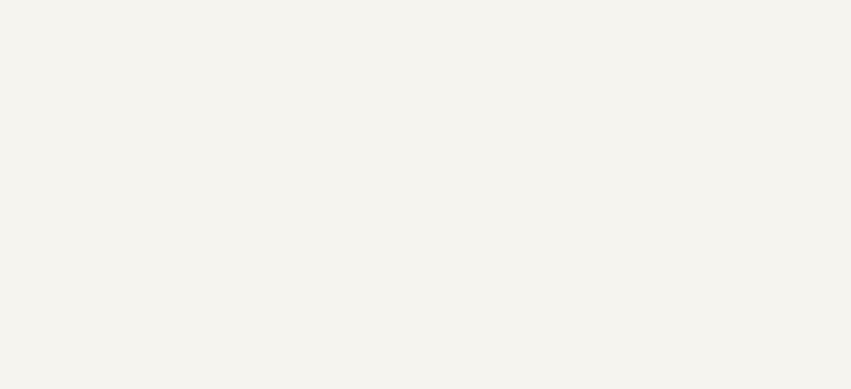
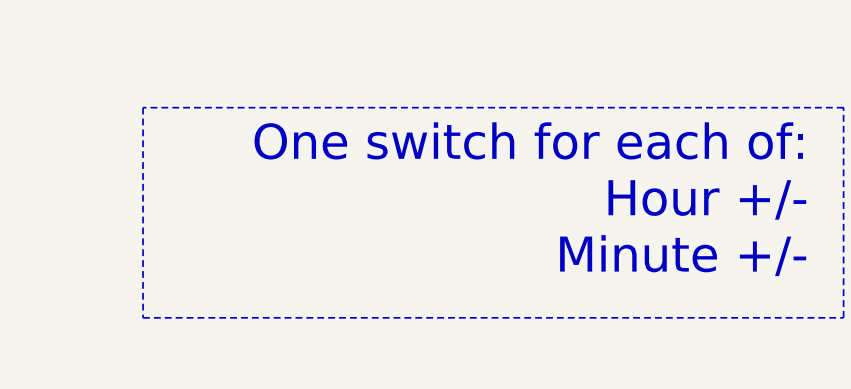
line: none -> (143, 107) (843, 107) (843, 317) (143, 317) (143, 107)
text: none -> One switch for each of: (528, 140)
text: none -> Hour +/- (707, 199)
text: none -> Minute +/- (683, 255)

